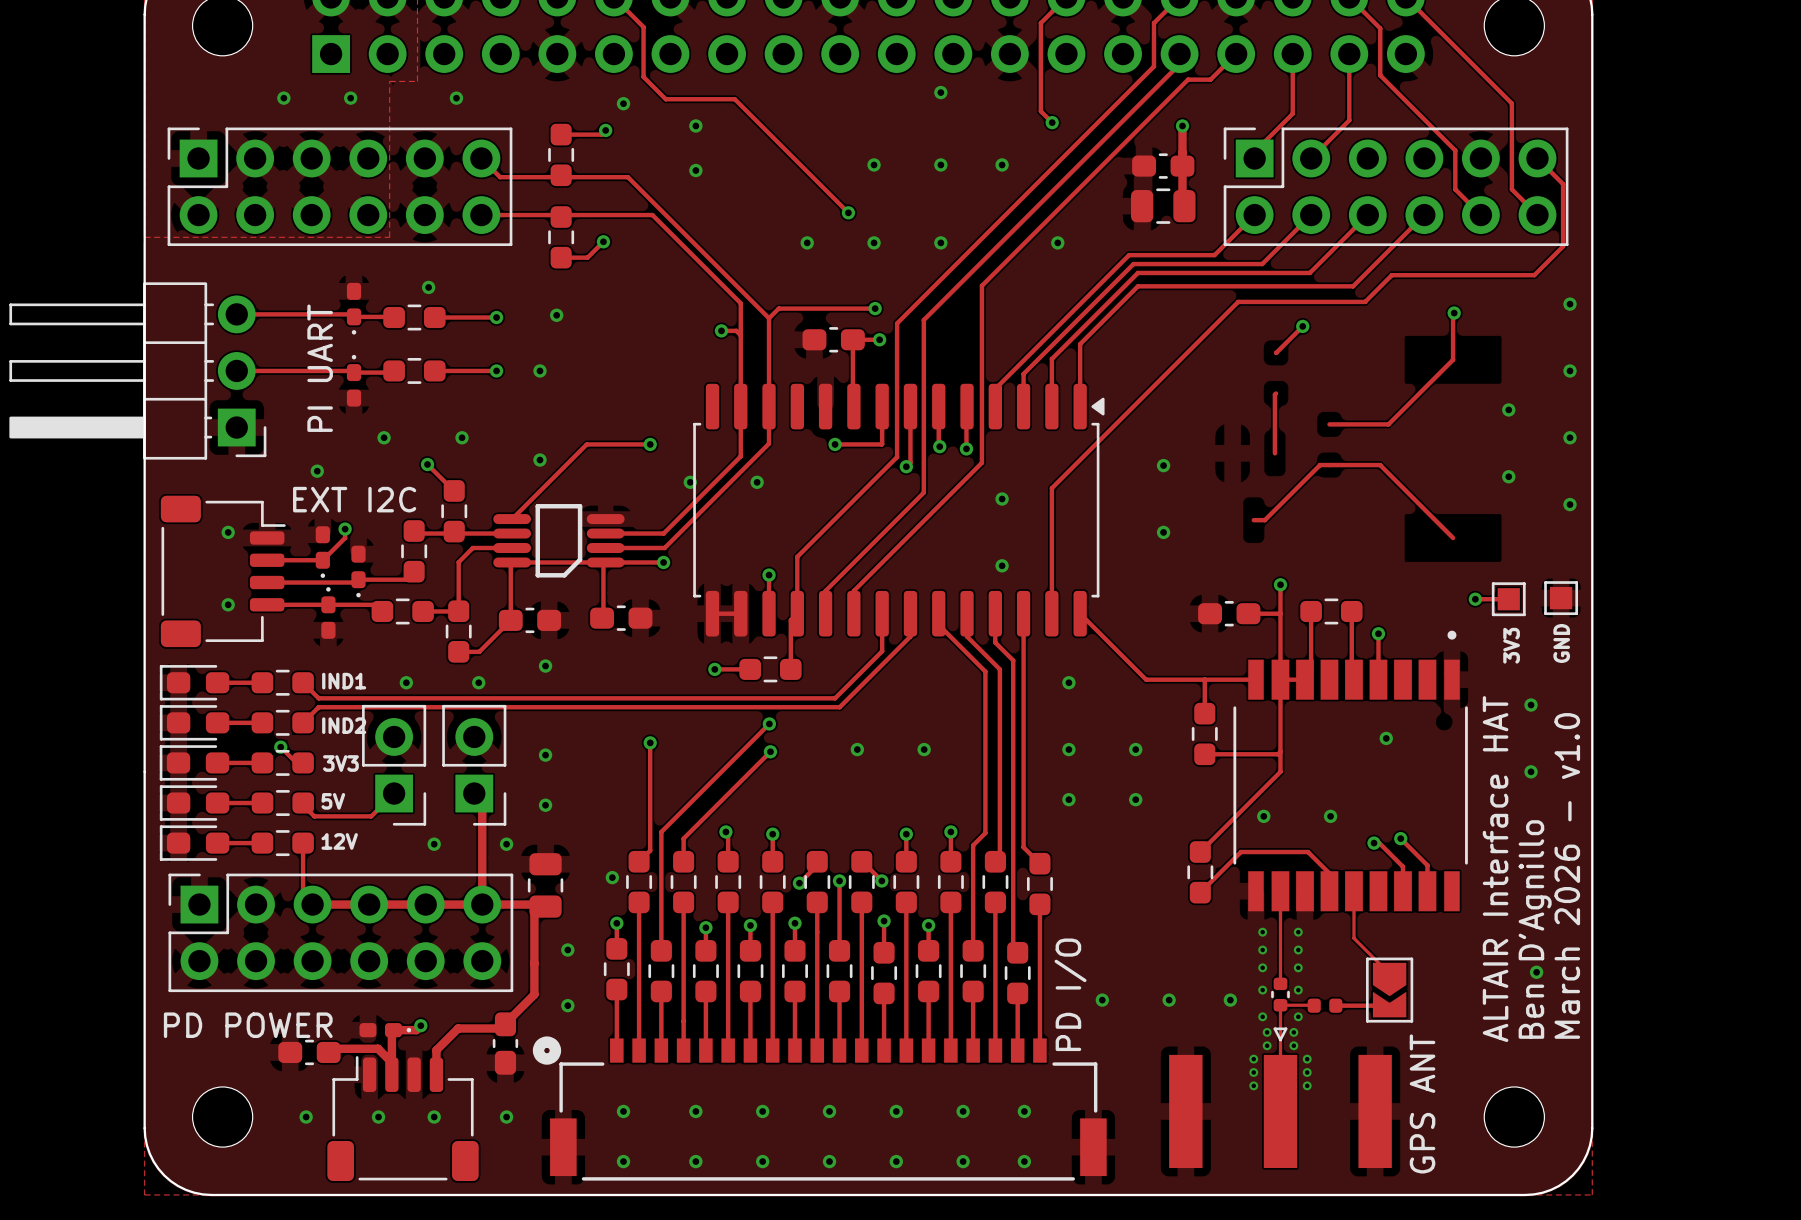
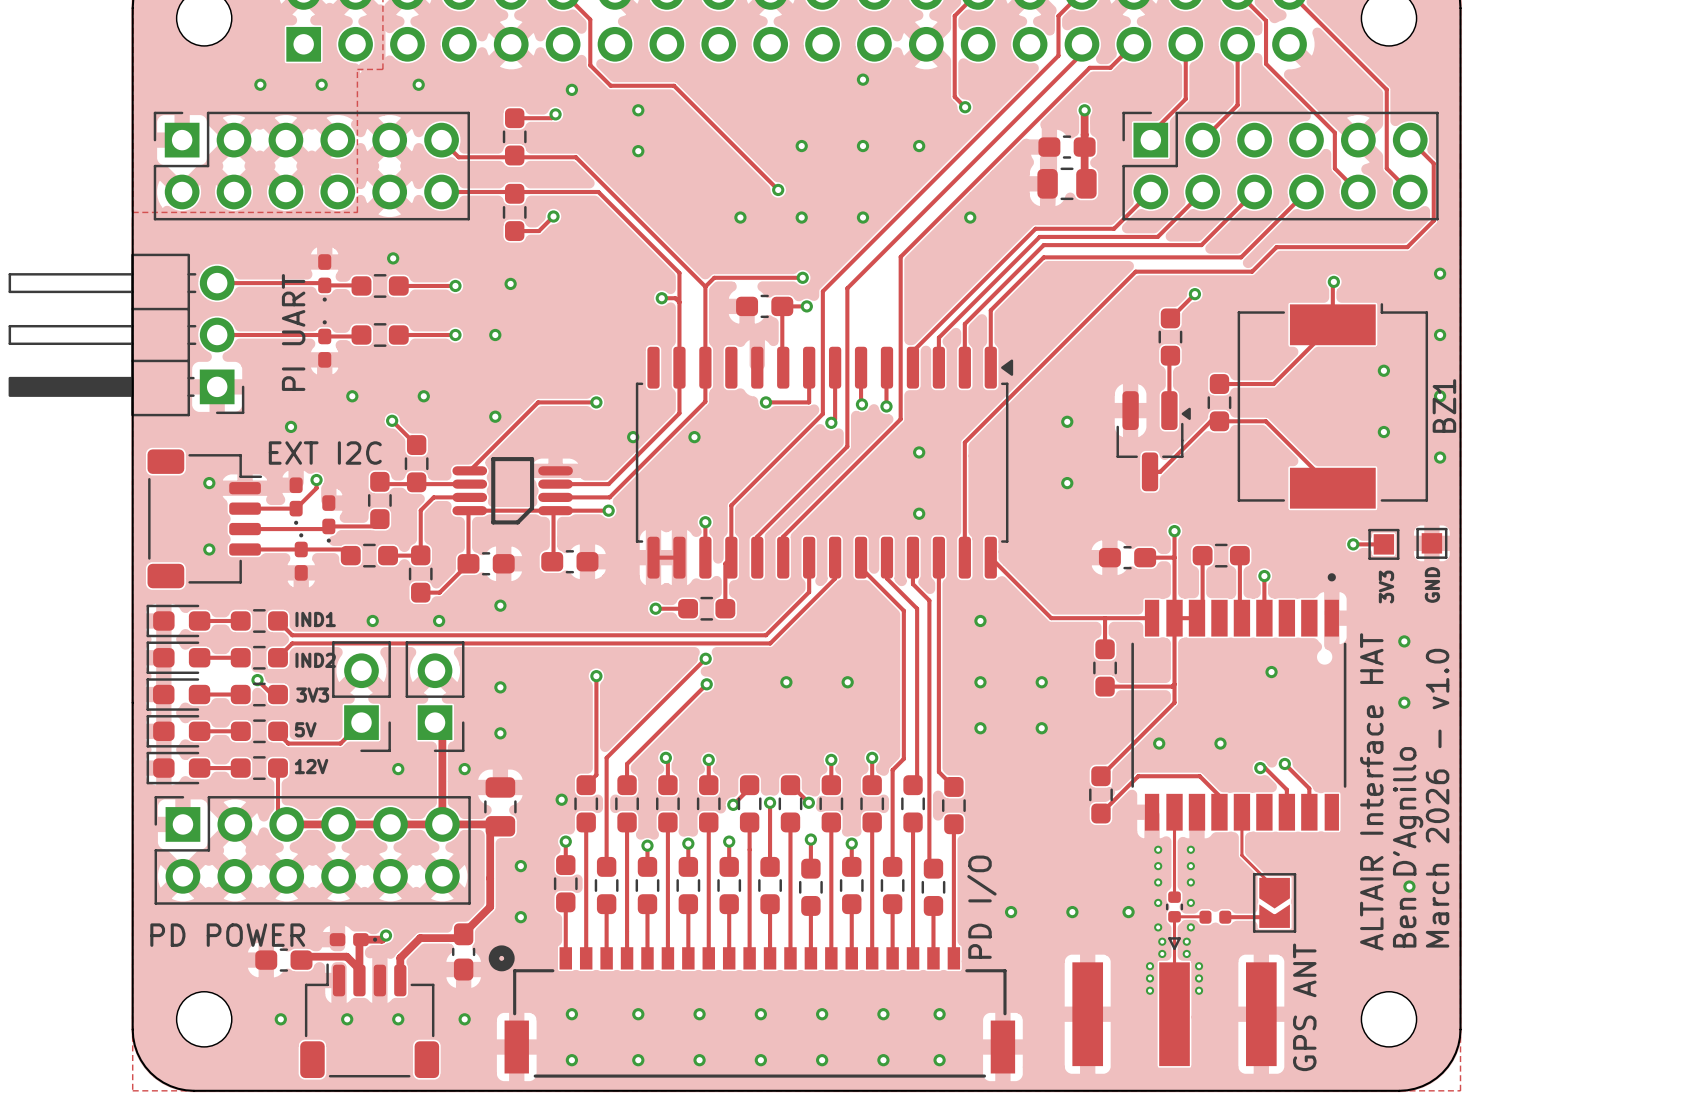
part: none -> (1170, 337)
part: none -> (1219, 402)
BZ1: none -> (1332, 405)
part: none -> (1153, 441)

